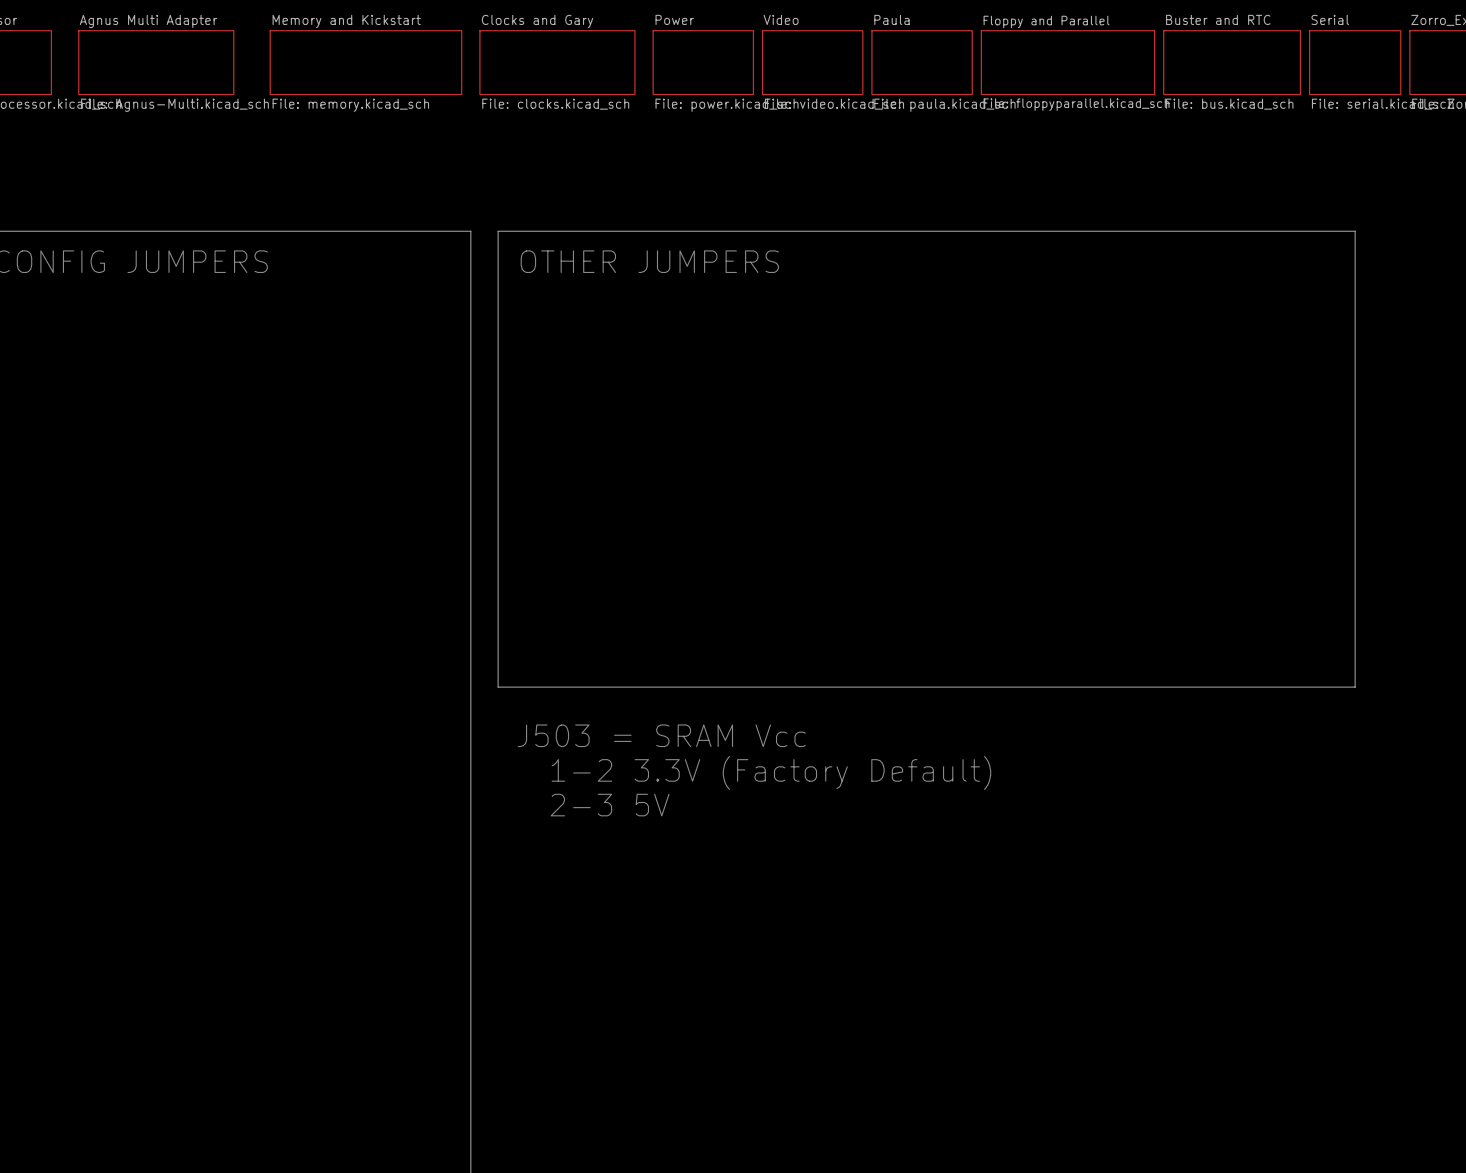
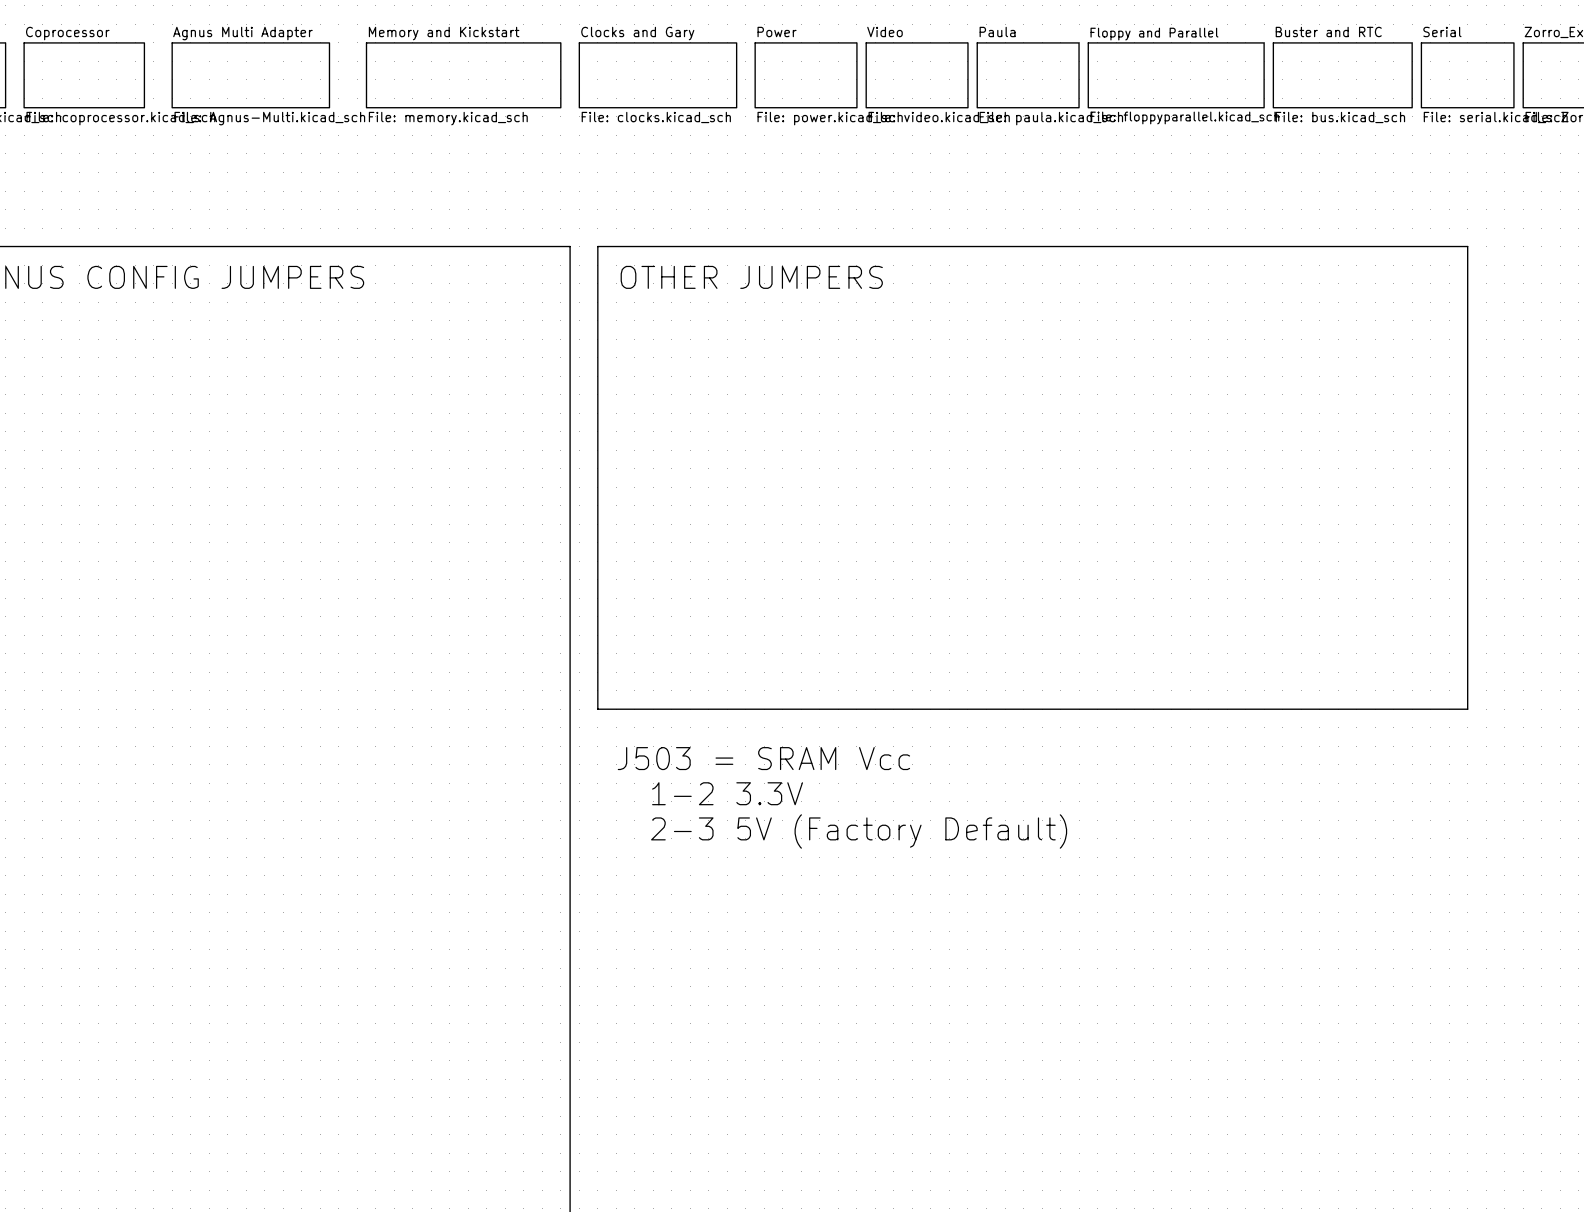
text: 1-2 3.3V (Factory Default) (771, 772) -> 1-2 3.3V (727, 793)
text: 2-3 5V (610, 805) -> 2-3 5V (Factory Default) (859, 831)

